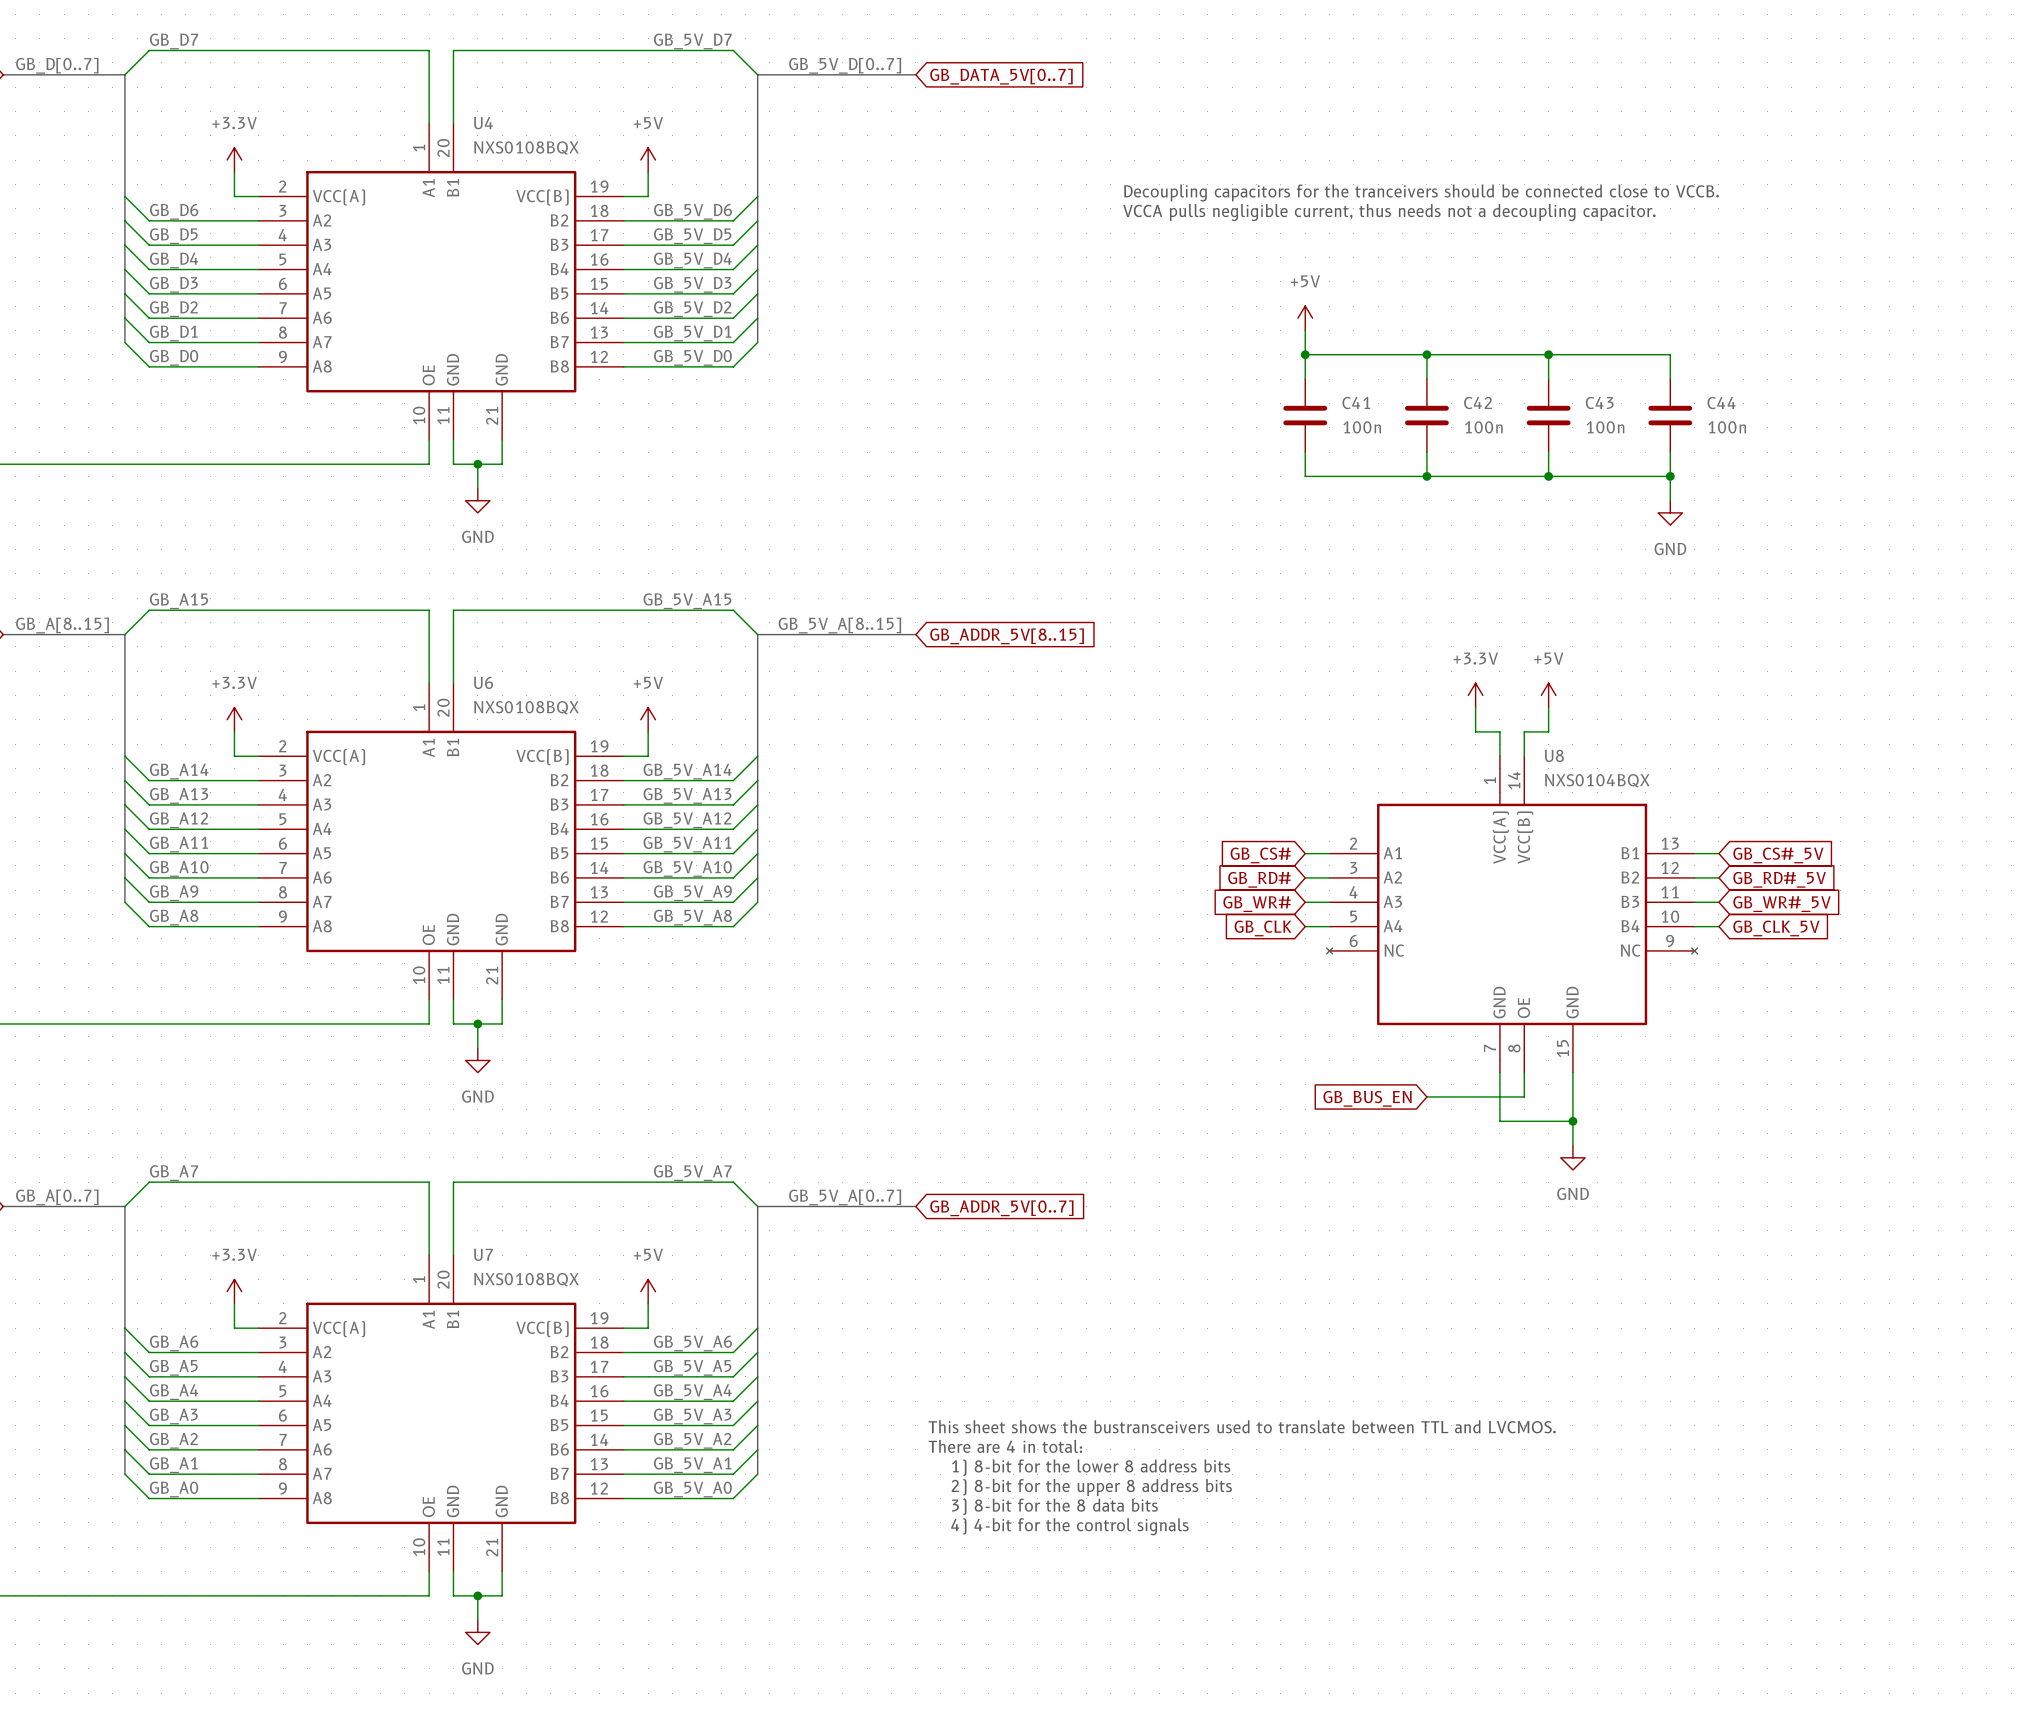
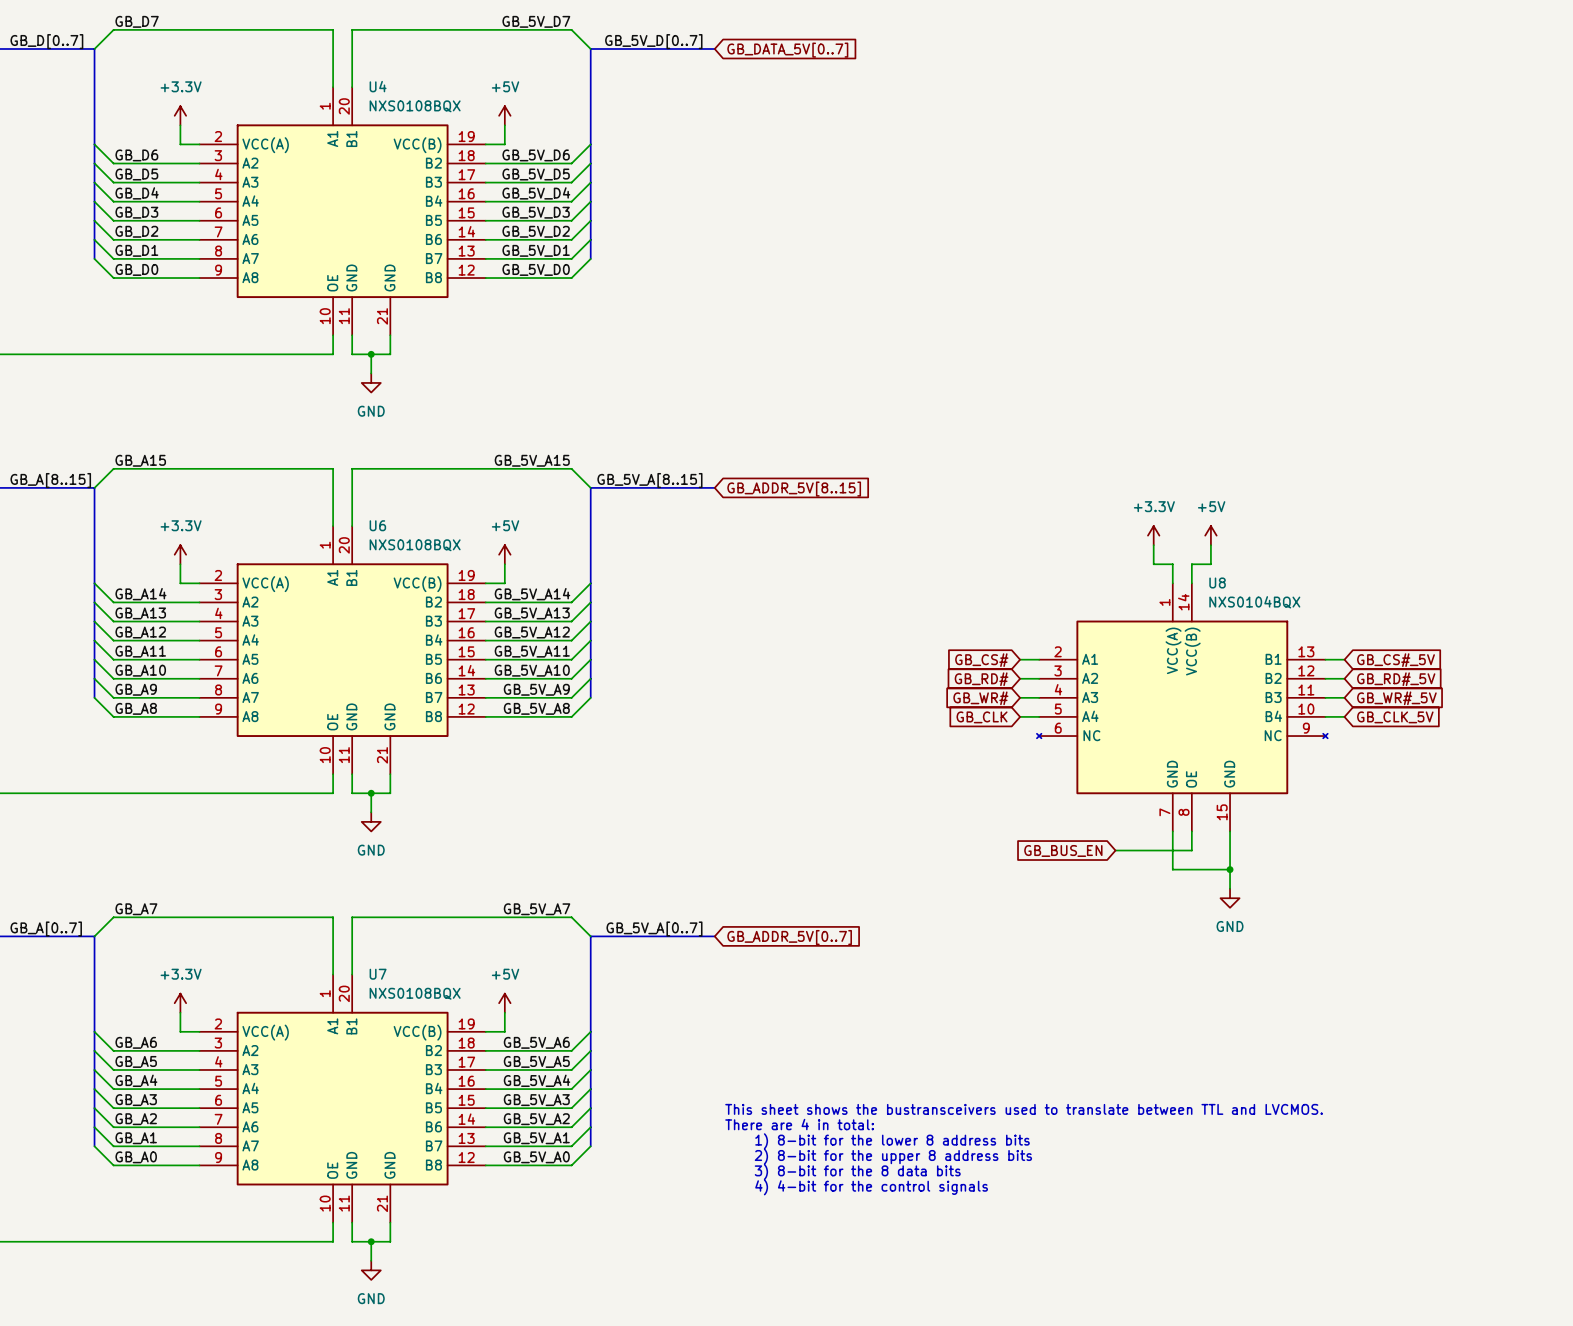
text: Decoupling capacitors for the tranceivers should be connected close to VCCB. (1421, 192) -> none
text: VCCA pulls negligible current, thus needs not a decoupling capacitor. (1389, 212) -> none
power symbol: +5V (1305, 318) -> none
wire: (1305, 330) (1305, 379) -> none
wire: (1305, 354) (1670, 354) (1670, 379) -> none
junction: (1305, 354) -> none
wire: (1426, 354) (1426, 379) -> none
junction: (1426, 354) -> none
wire: (1548, 354) (1548, 379) -> none
junction: (1548, 354) -> none
C41: 100n (1305, 415) -> none
C42: 100n (1426, 415) -> none
C43: 100n (1548, 415) -> none
C44: 100n (1670, 415) -> none
wire: (1305, 452) (1305, 476) (1670, 476) -> none
wire: (1426, 452) (1426, 476) -> none
wire: (1548, 452) (1548, 476) -> none
wire: (1670, 452) (1670, 500) -> none
junction: (1426, 476) -> none
junction: (1548, 476) -> none
junction: (1670, 476) -> none
power symbol: GND (1670, 512) -> none

